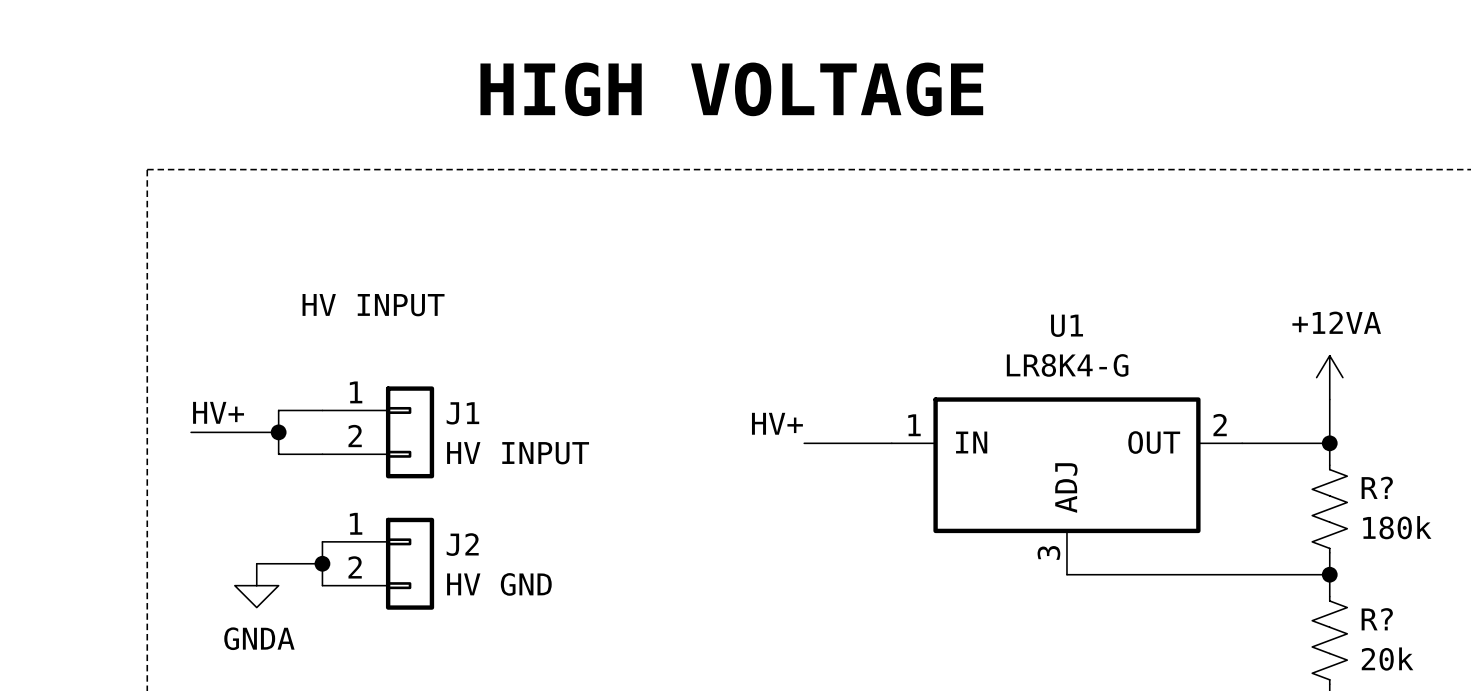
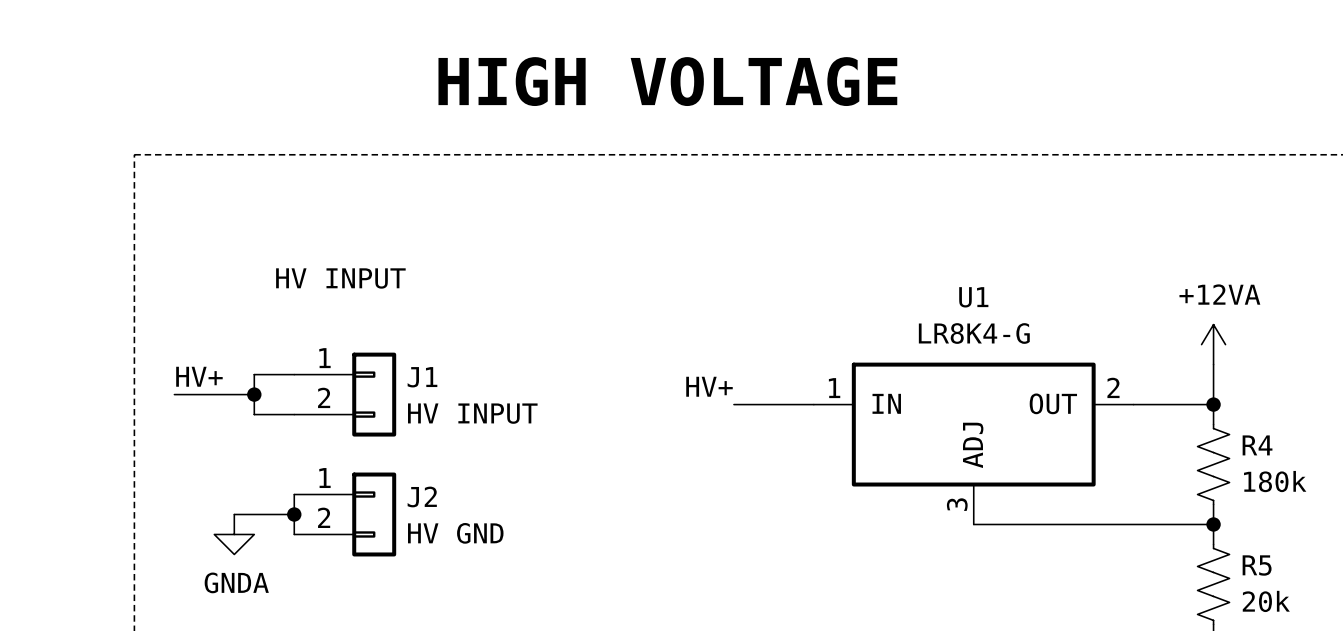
R? name: R? (1377, 487) -> R4 (1257, 445)
R? name: R? (1377, 619) -> R5 (1257, 565)

